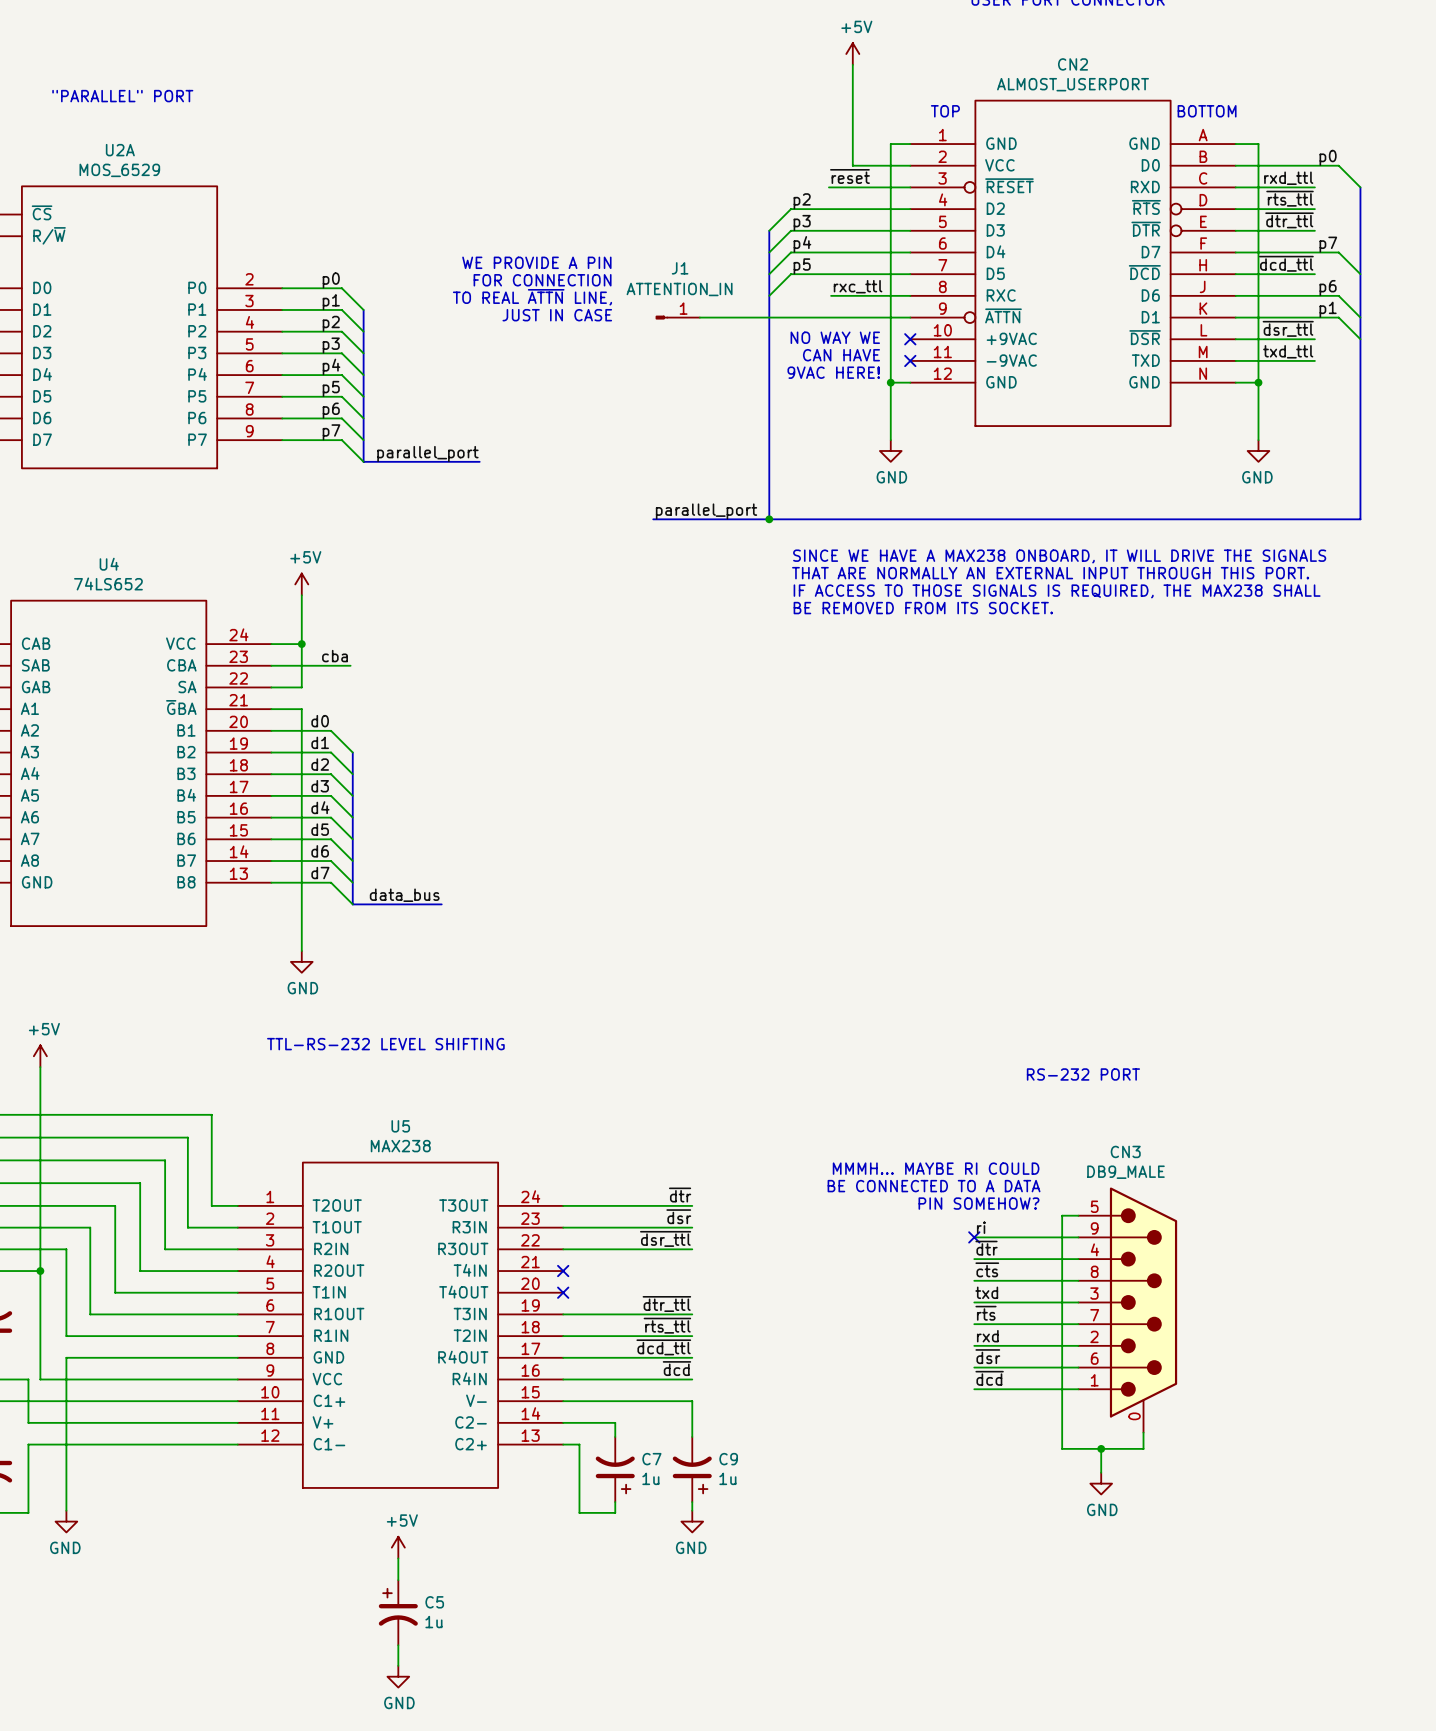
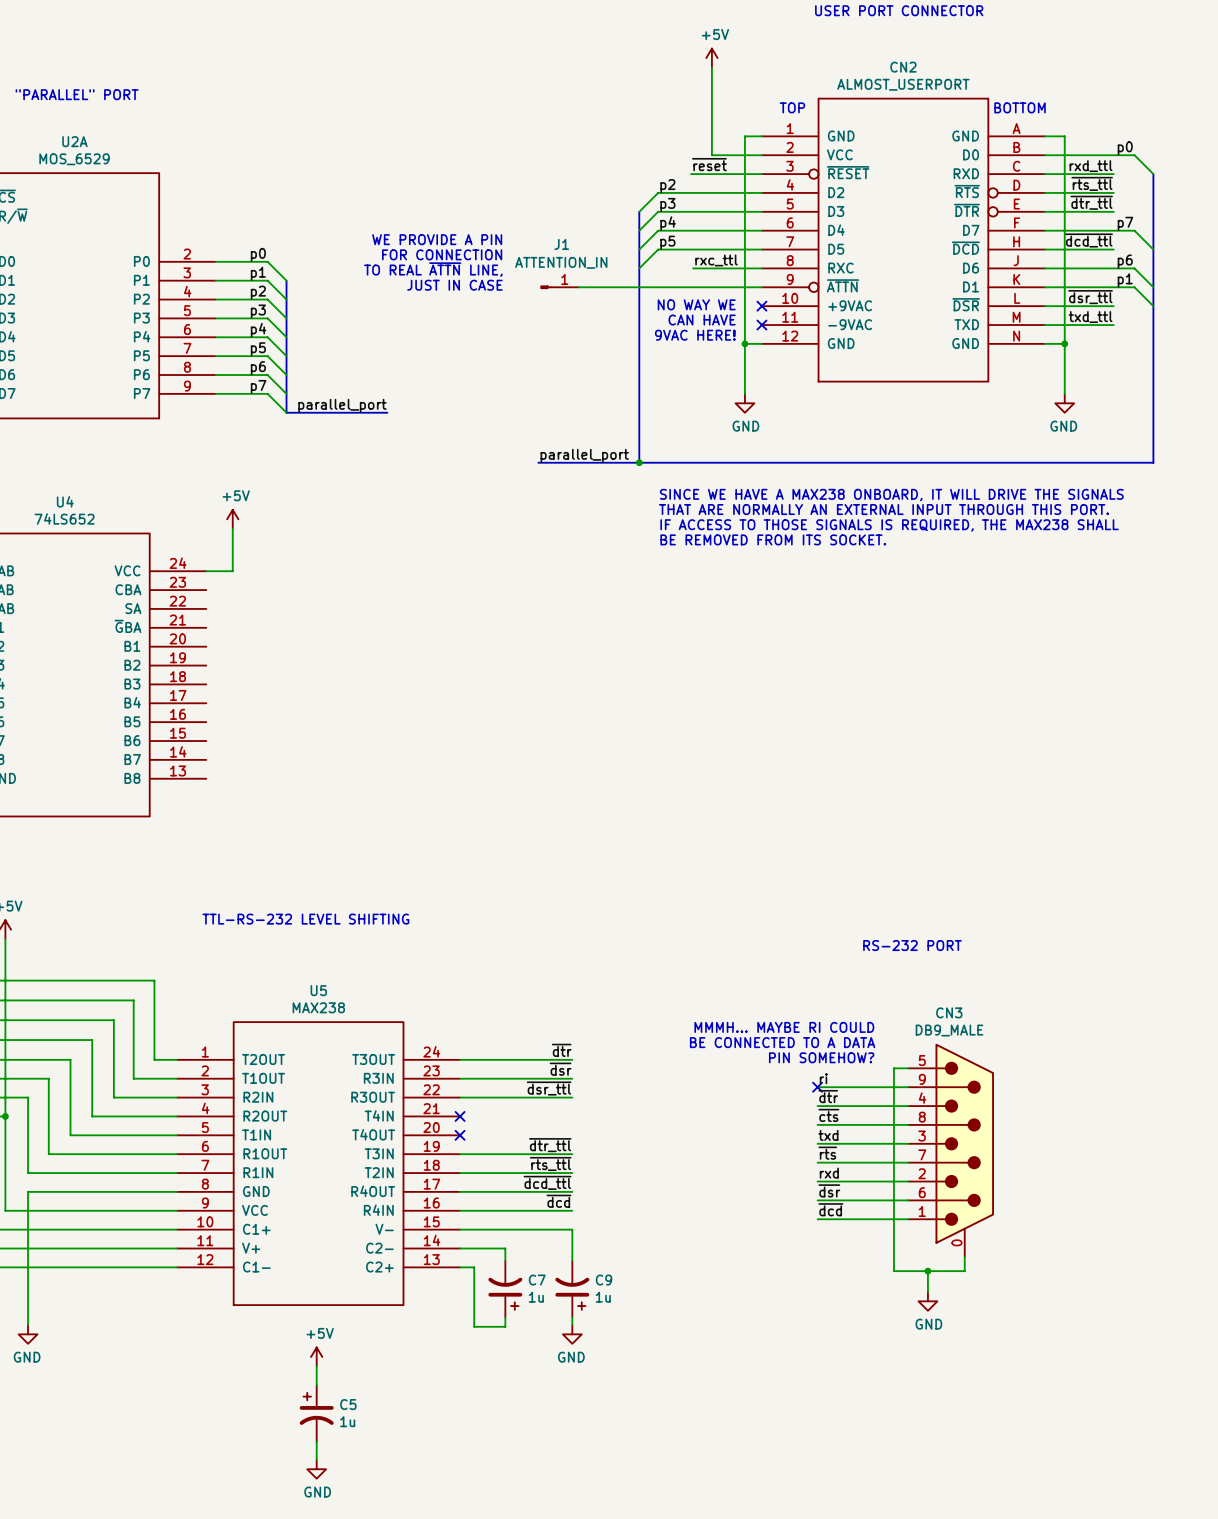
wire: (301, 644) (301, 687) (271, 687) -> none
junction: (301, 644) -> none
label: cba (335, 656) -> none
wire: (271, 665) (350, 665) -> none
wire: (271, 709) (301, 709) (301, 951) -> none
label: d0 (320, 721) -> none
wire: (271, 730) (331, 730) (352, 752) -> none
label: d1 (320, 742) -> none
wire: (271, 752) (331, 752) (352, 774) -> none
bus: (352, 752) (352, 904) (441, 904) -> none
label: d2 (320, 764) -> none
wire: (271, 774) (331, 774) (352, 795) -> none
label: d3 (320, 786) -> none
wire: (271, 795) (331, 795) (352, 817) -> none
label: d4 (320, 807) -> none
wire: (271, 817) (331, 817) (352, 839) -> none
label: d5 (320, 829) -> none
wire: (271, 839) (331, 839) (352, 861) -> none
label: d6 (320, 851) -> none
wire: (271, 861) (331, 861) (352, 882) -> none
label: d7 (320, 873) -> none
wire: (271, 882) (331, 882) (352, 904) -> none
label: data_bus (404, 895) -> none
power symbol: GND (301, 961) -> none

